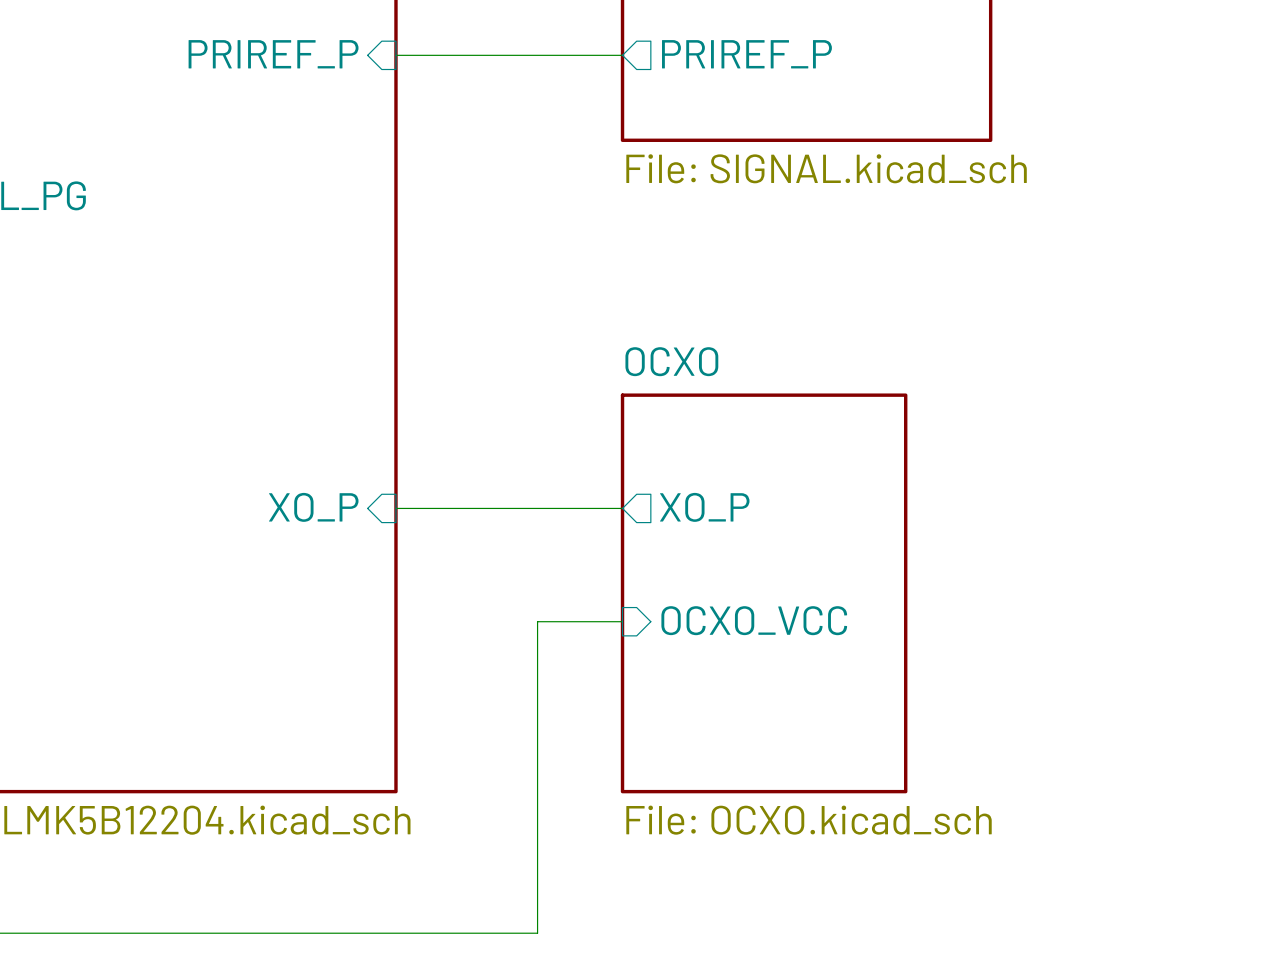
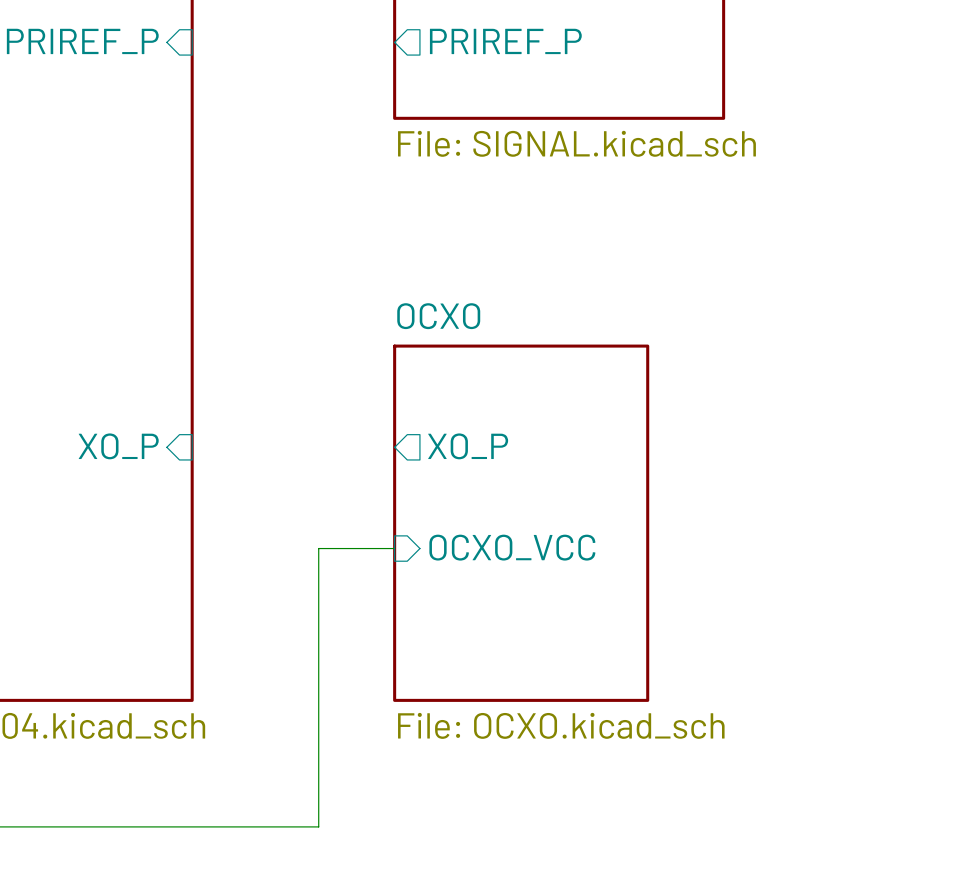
wire: (395, 55) (622, 55) -> none
wire: (395, 508) (622, 508) -> none

